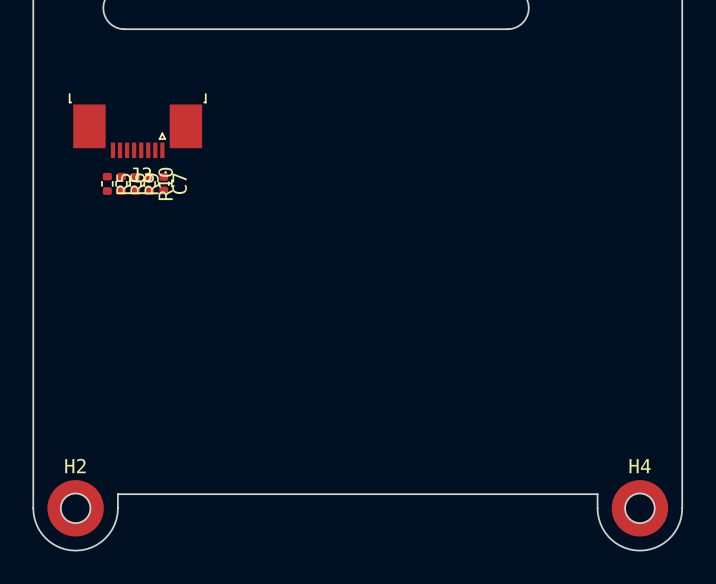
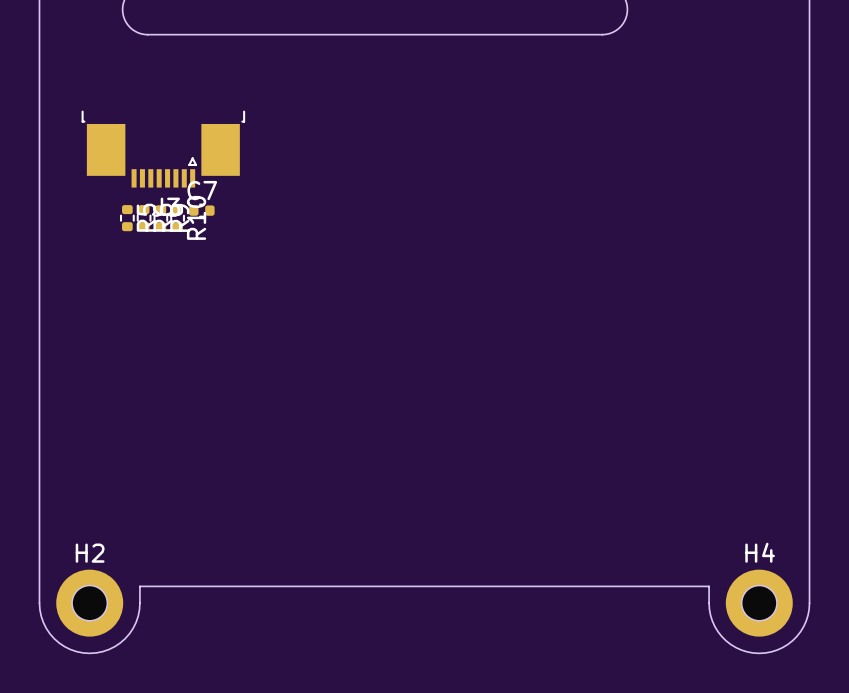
C7 rotation: 0° (163, 183) -> 90° clockwise (201, 210)

